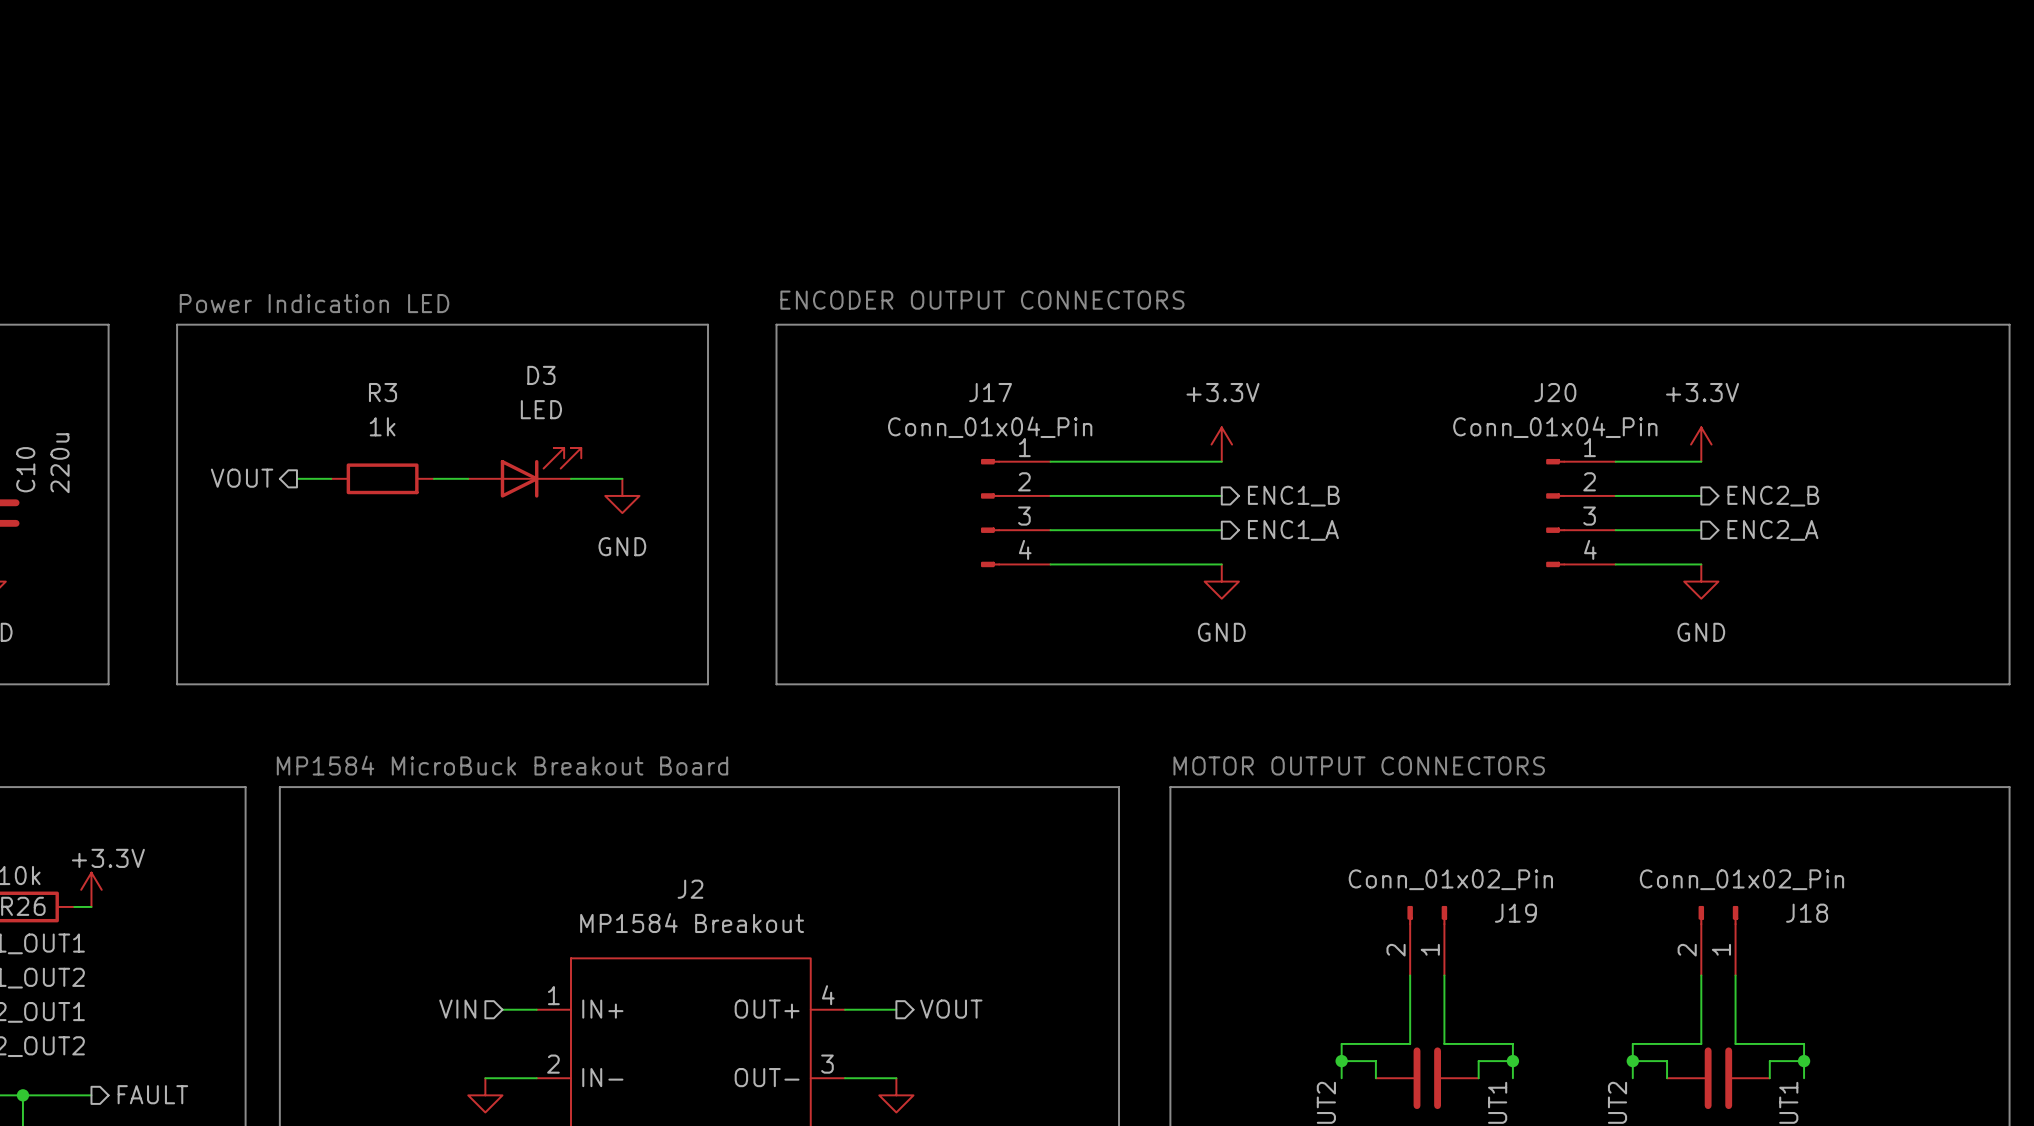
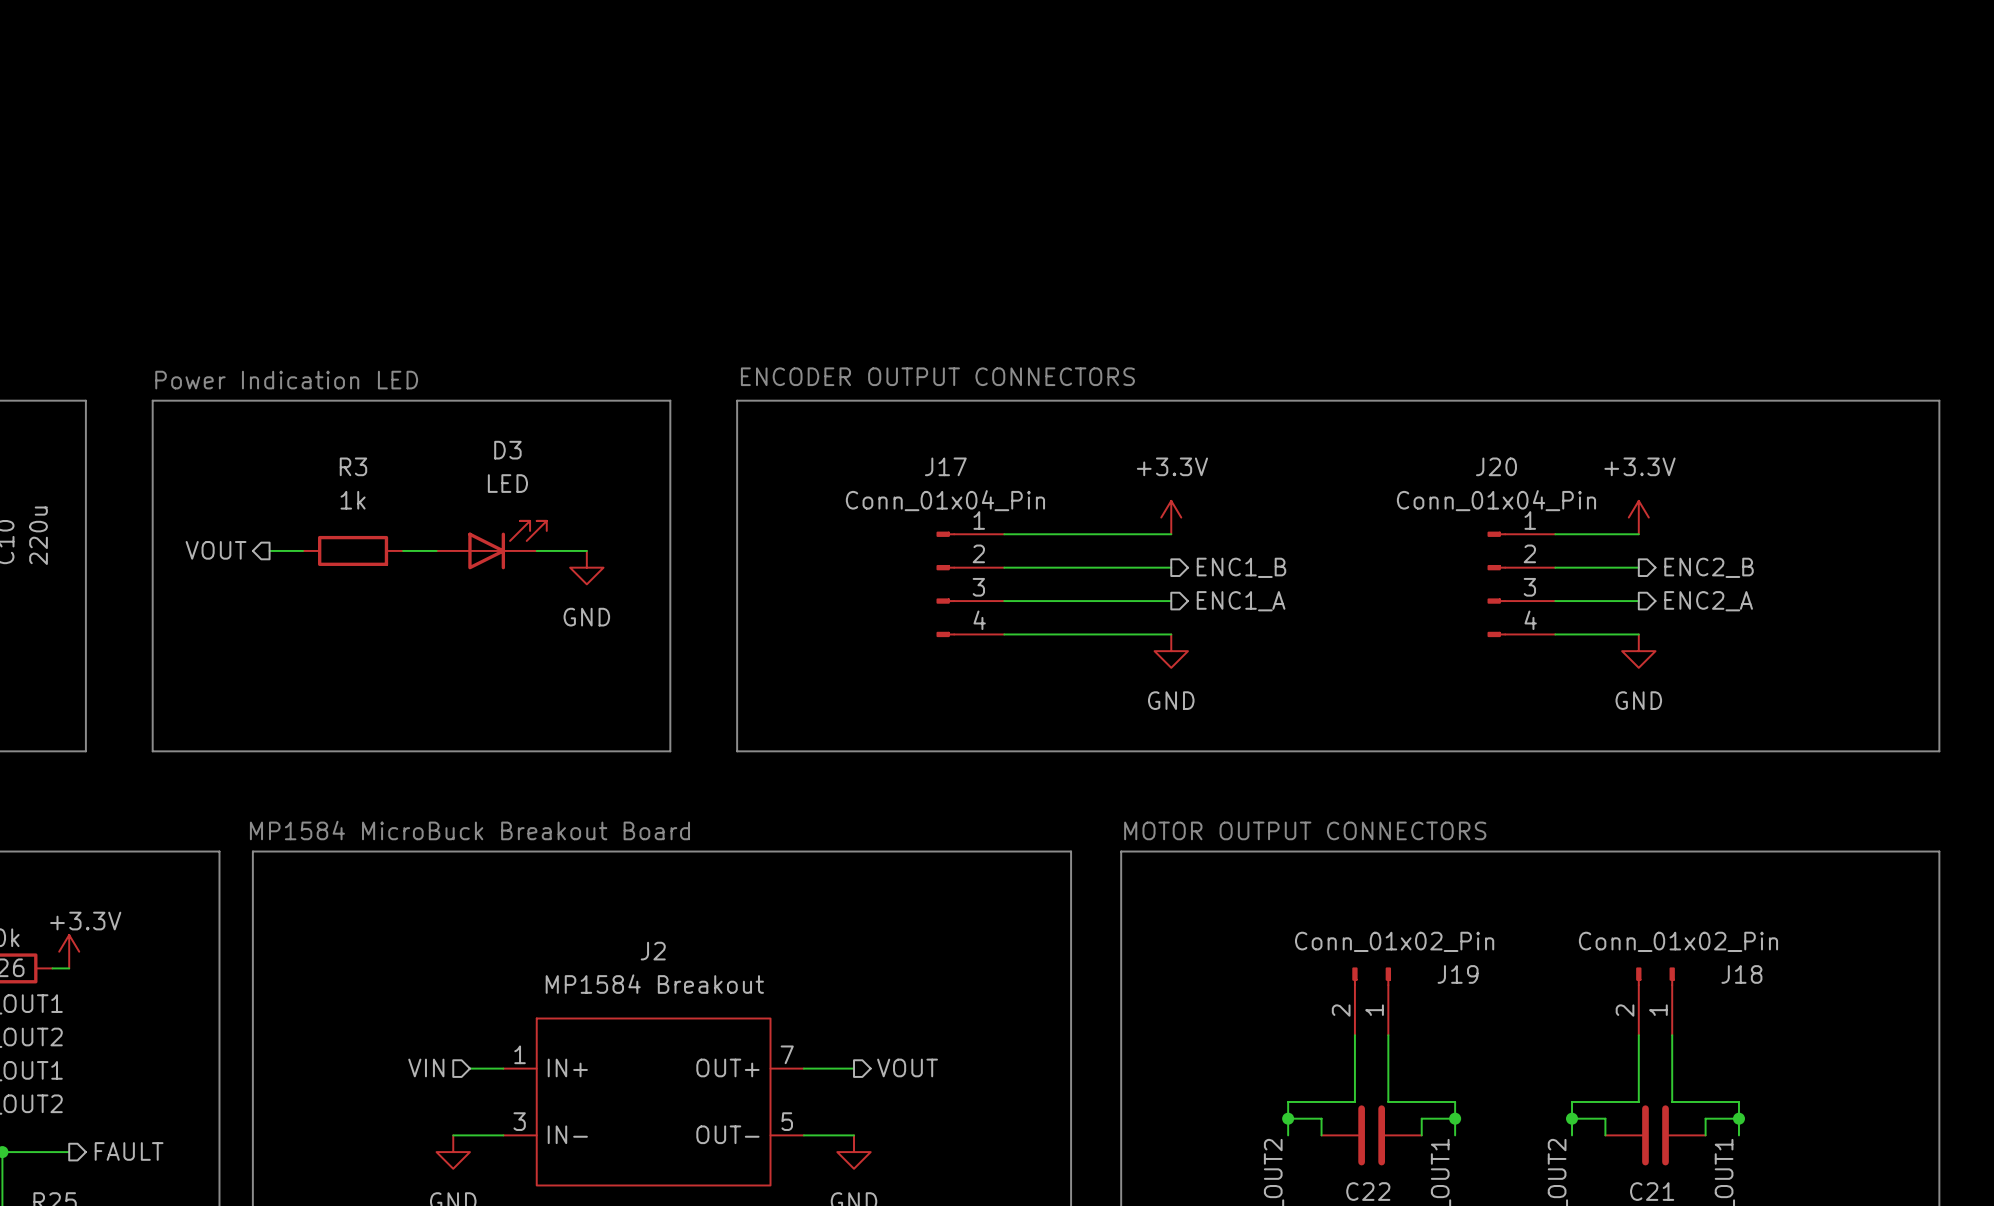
J2 pin number: 4 (828, 995) -> 7 (787, 1054)
J2 pin number: 2 (553, 1064) -> 3 (519, 1121)
J2 pin number: 3 (827, 1064) -> 5 (787, 1121)

